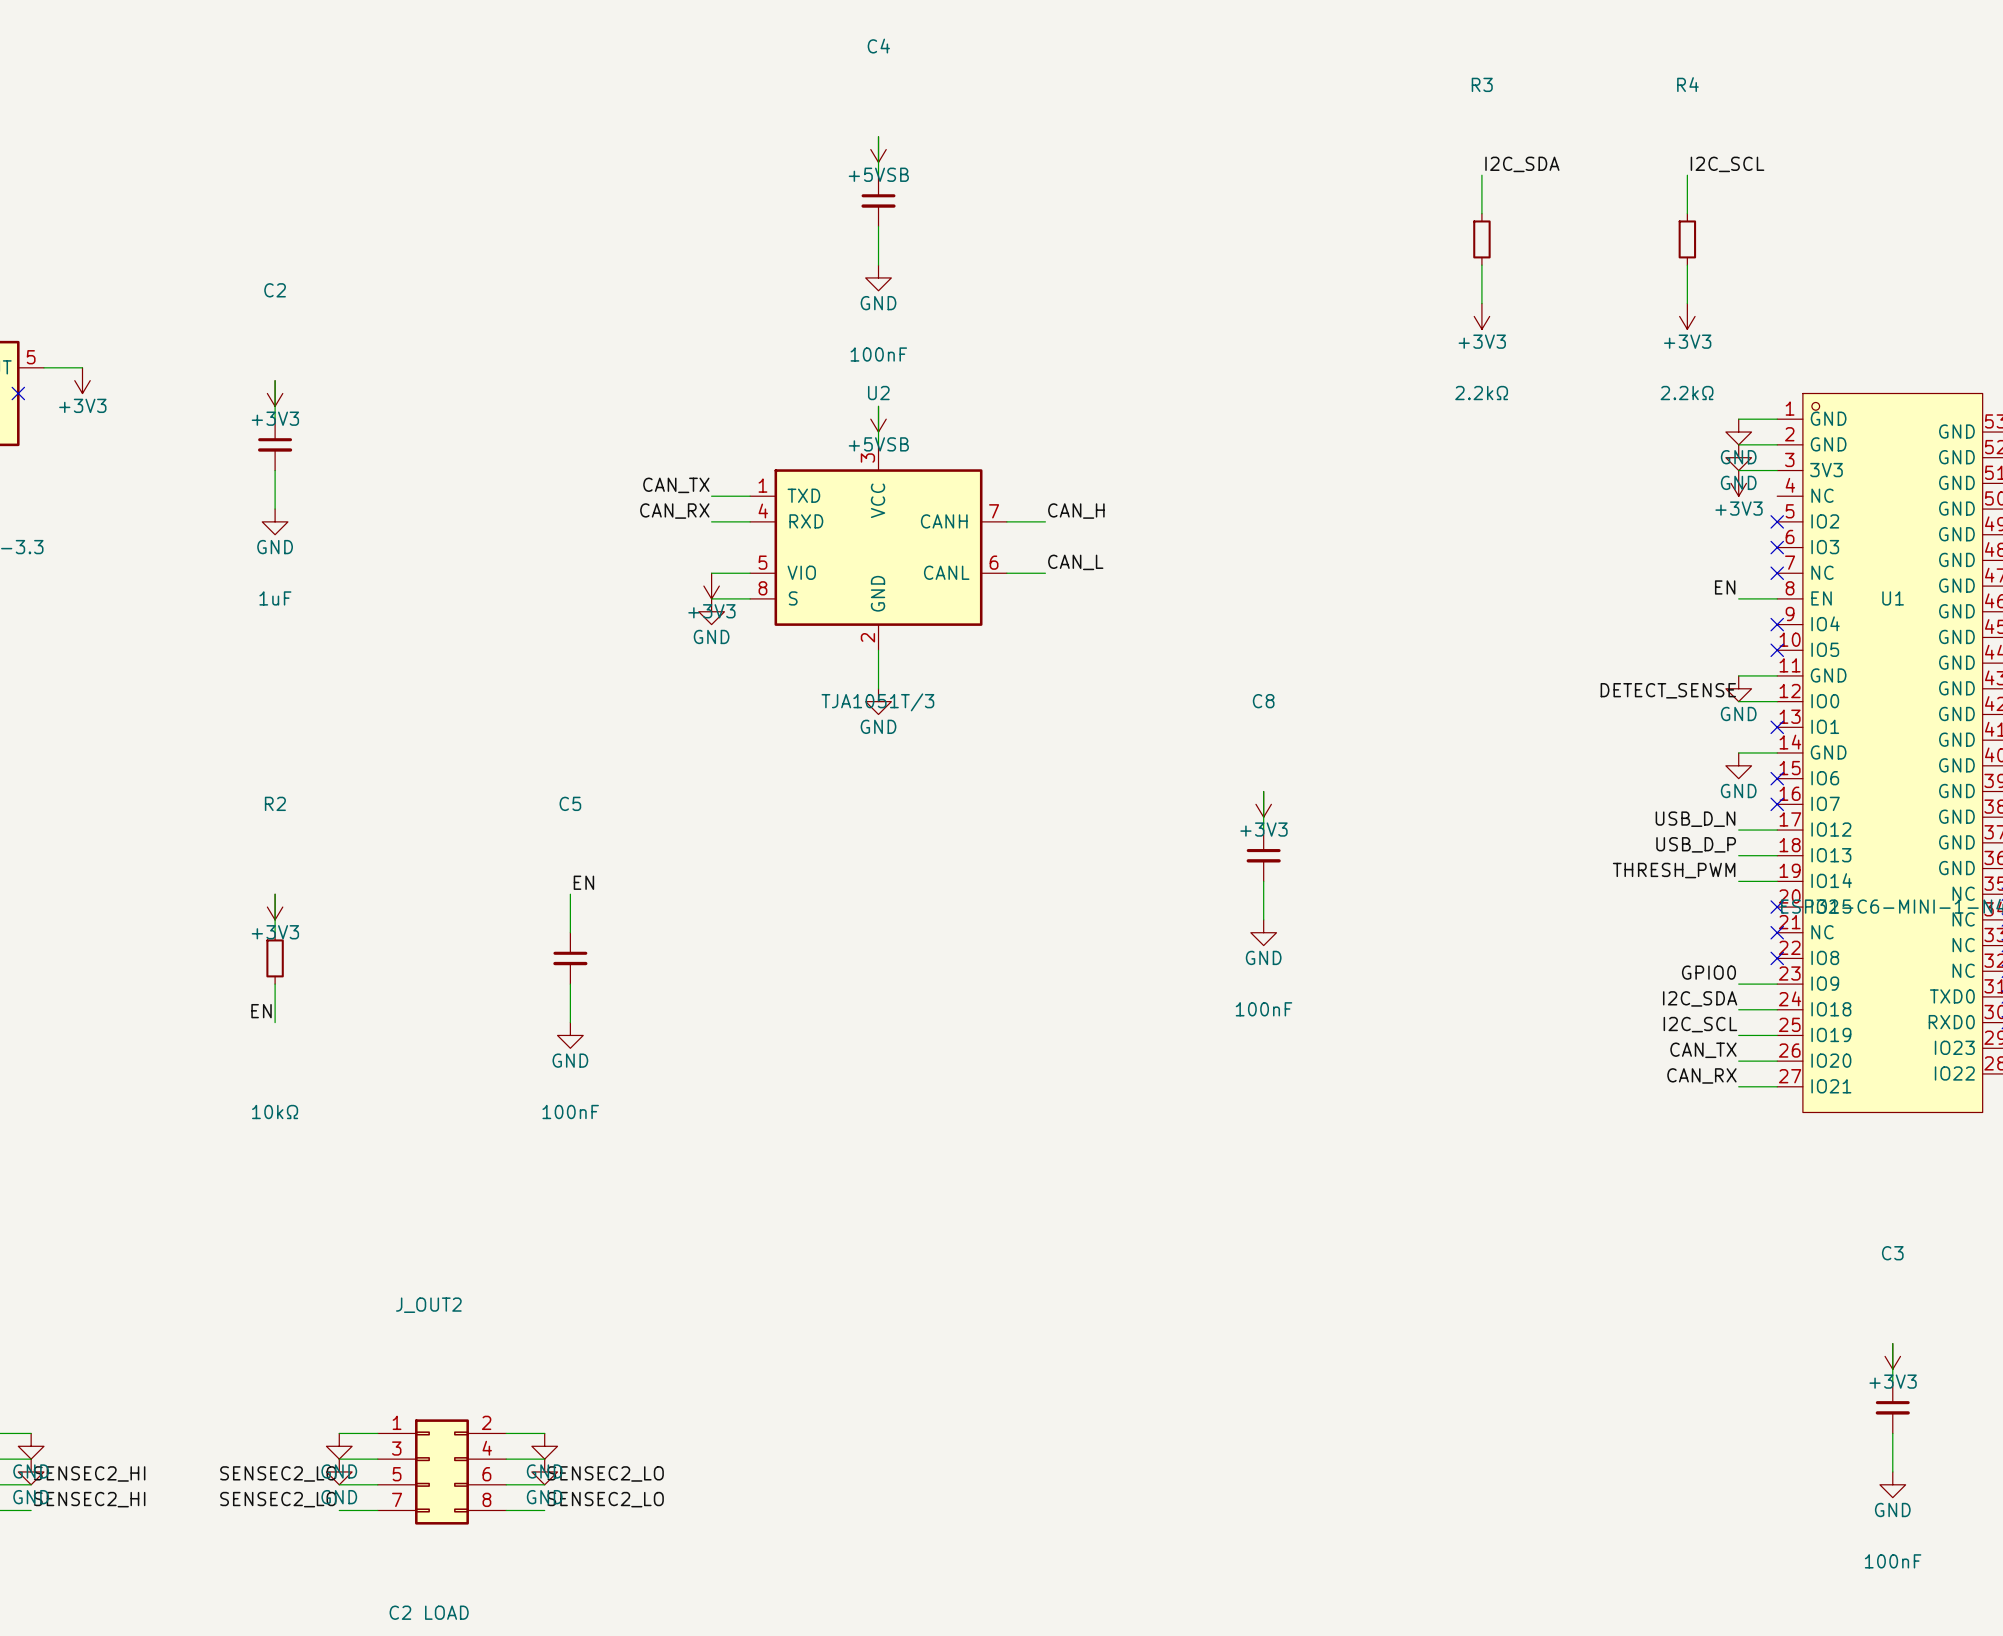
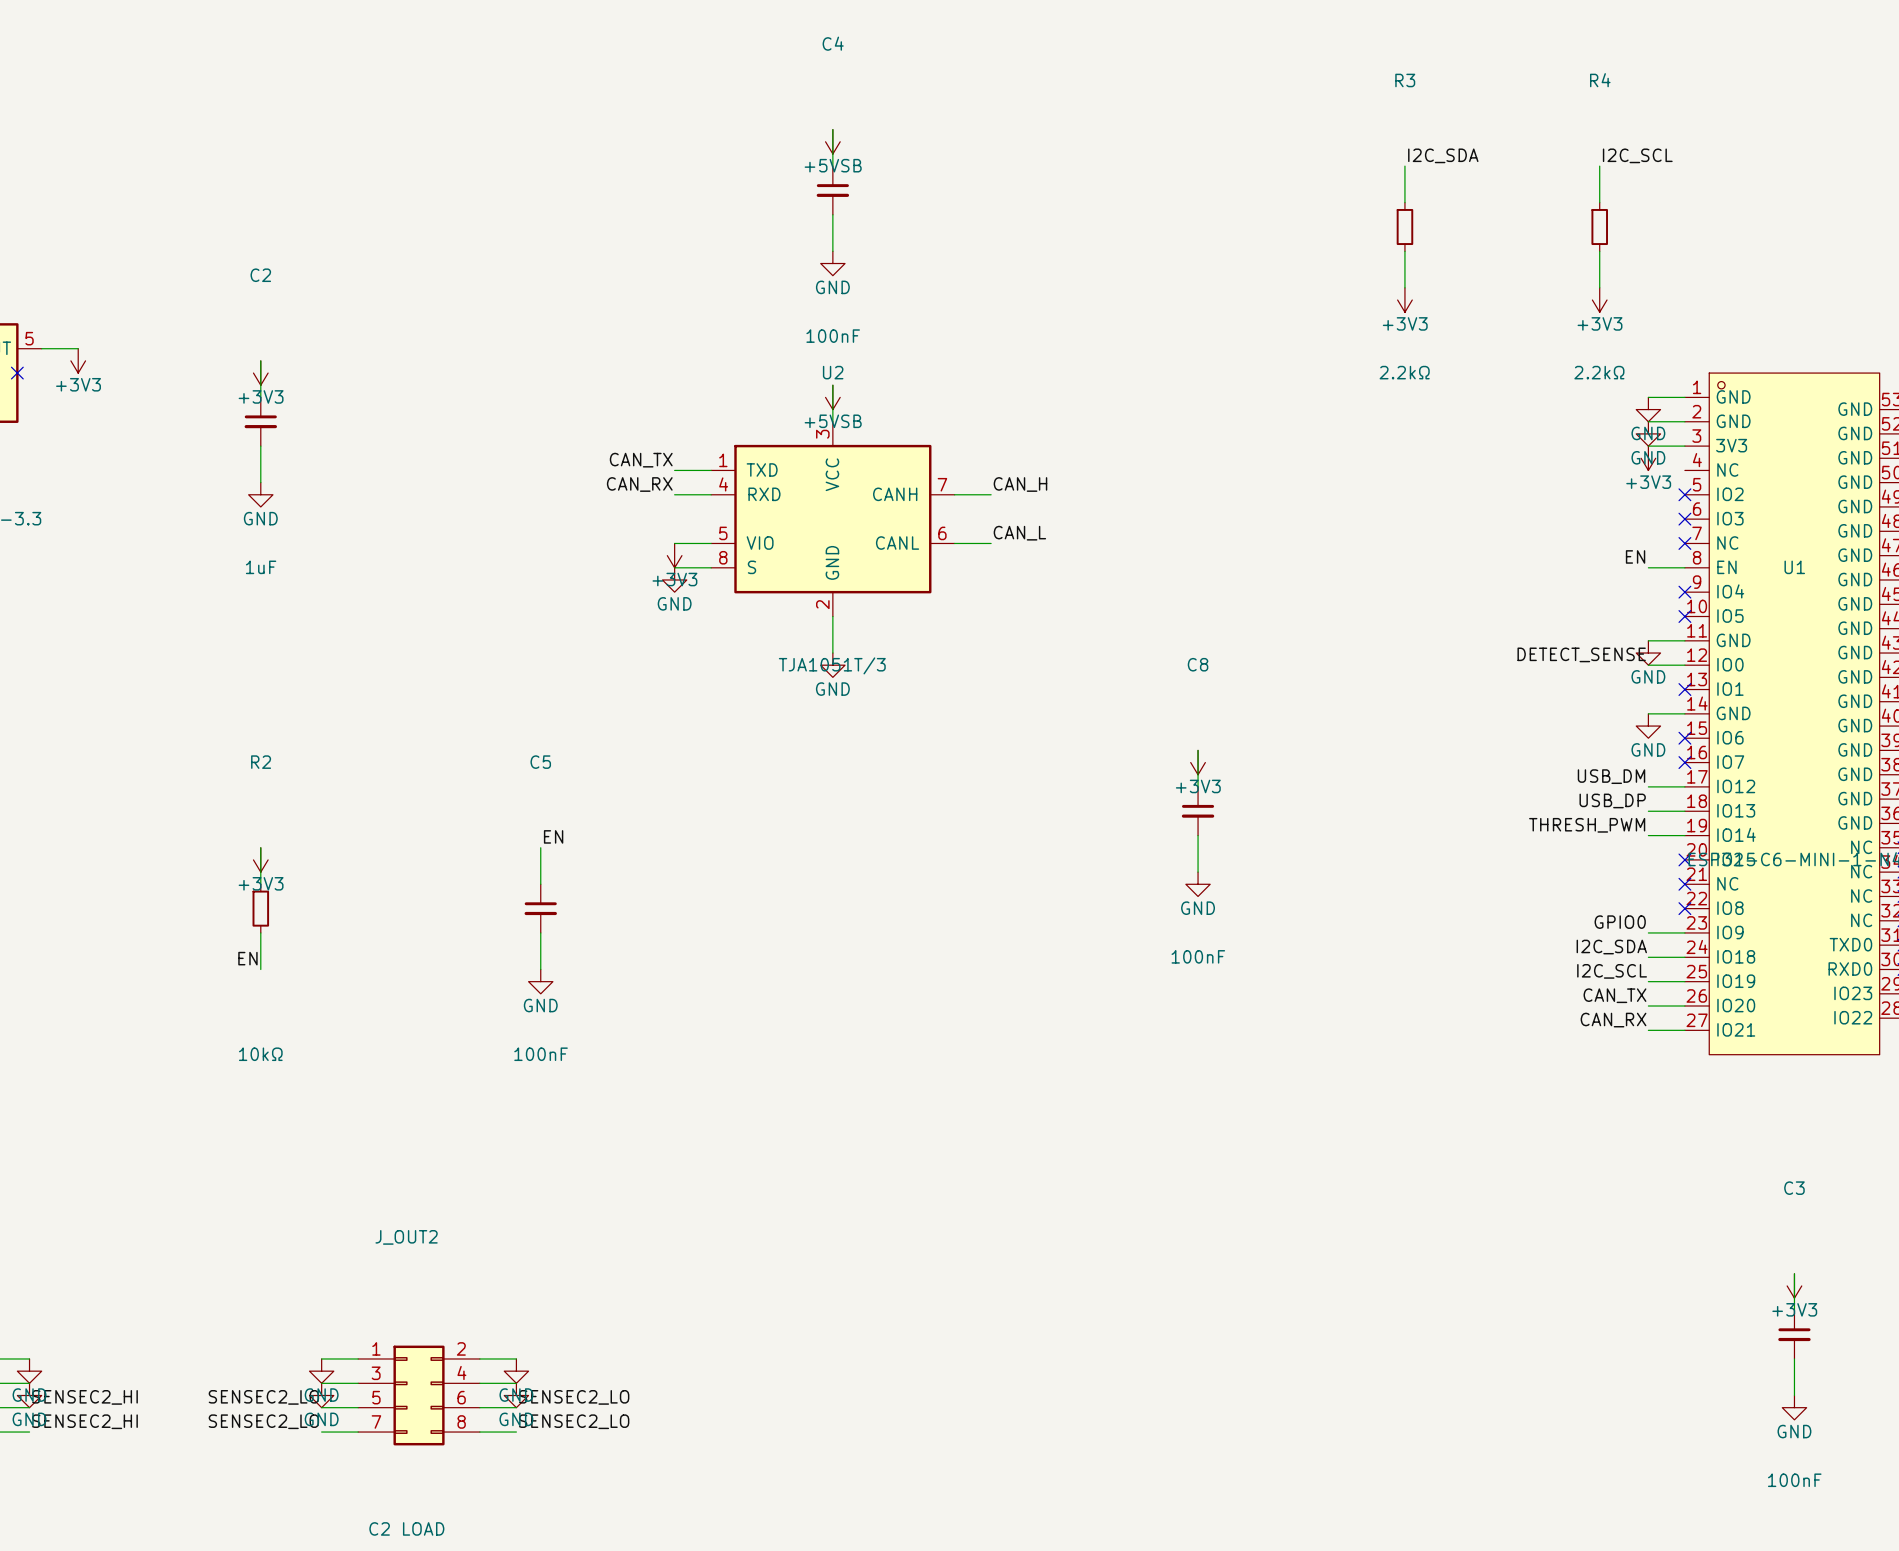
label: USB_D_N (1695, 819) -> USB_DM (1611, 776)
label: USB_D_P (1696, 844) -> USB_DP (1612, 800)

